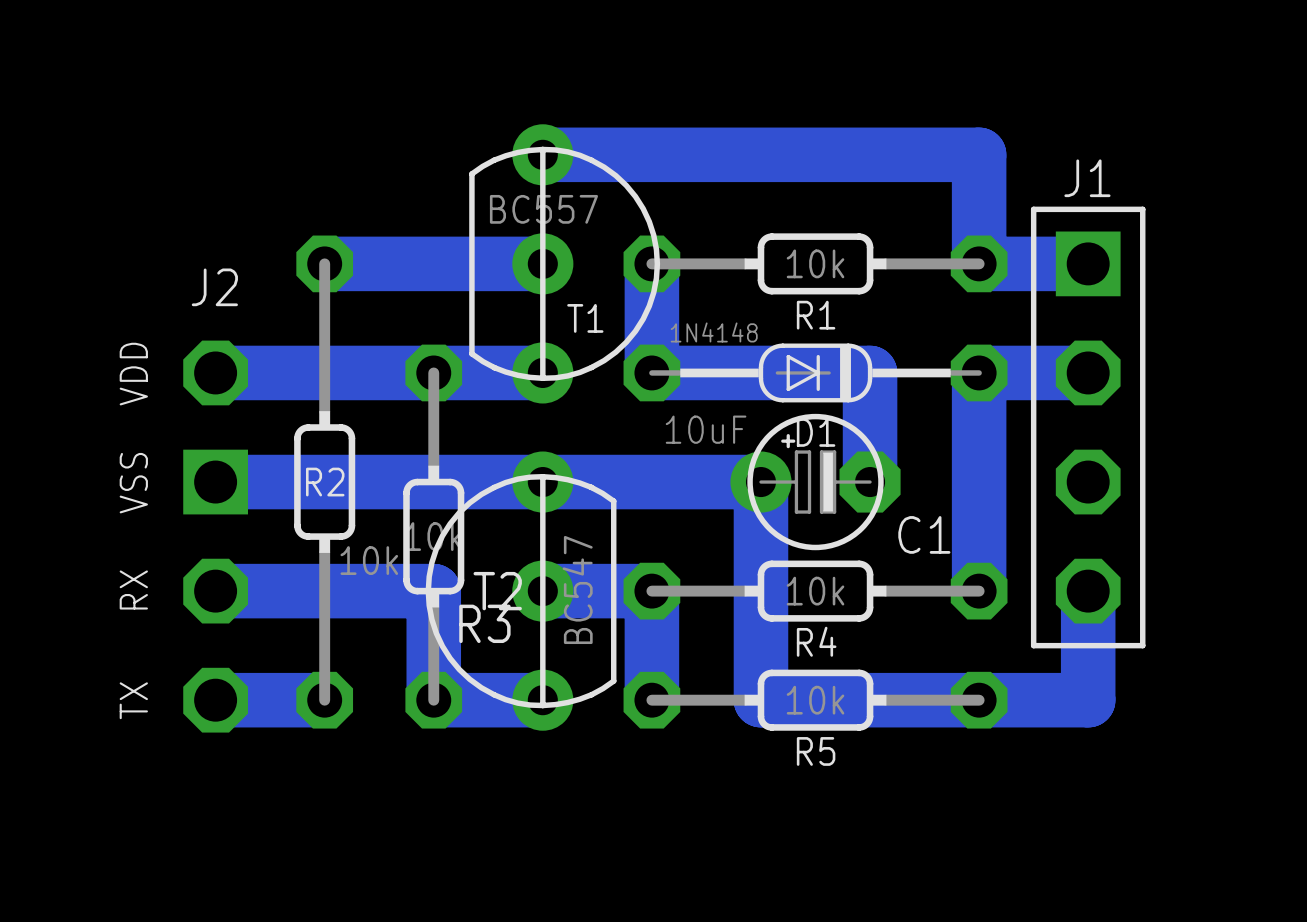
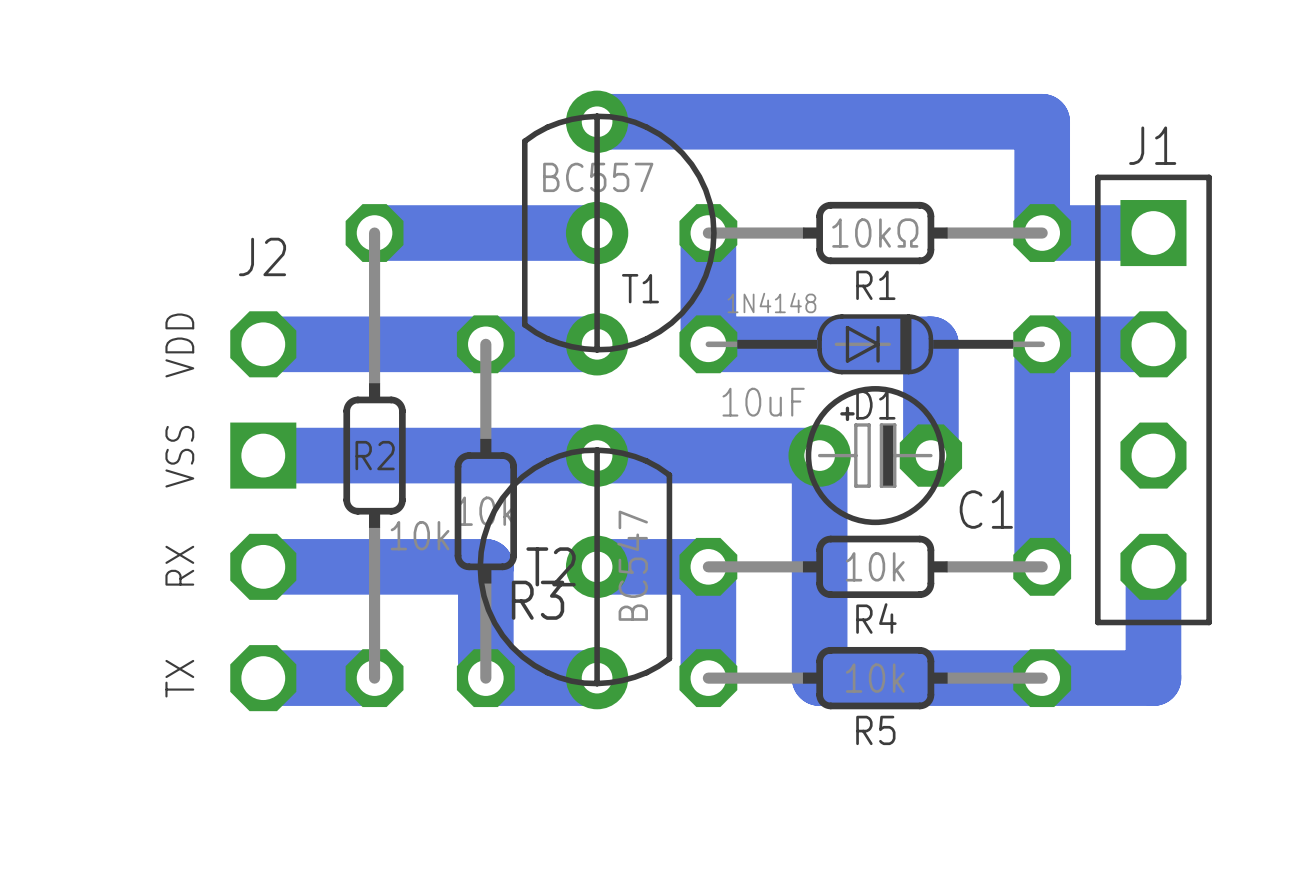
R1 value: 10k (815, 263) -> 10kΩ (875, 233)

